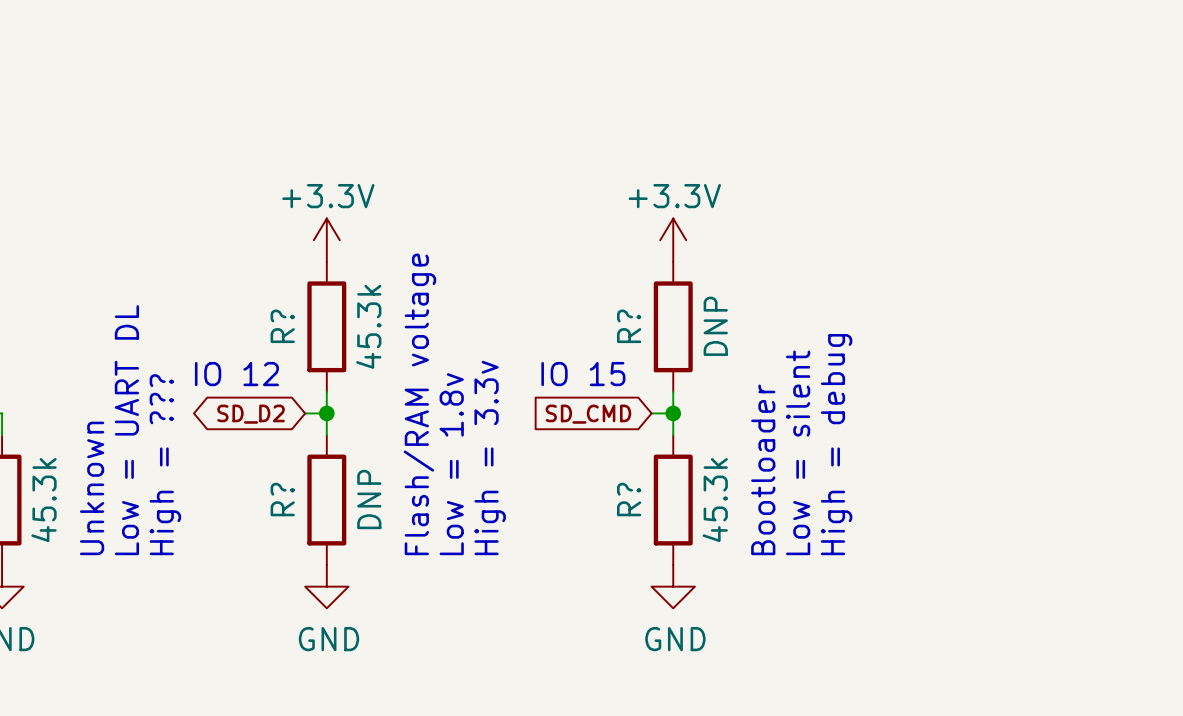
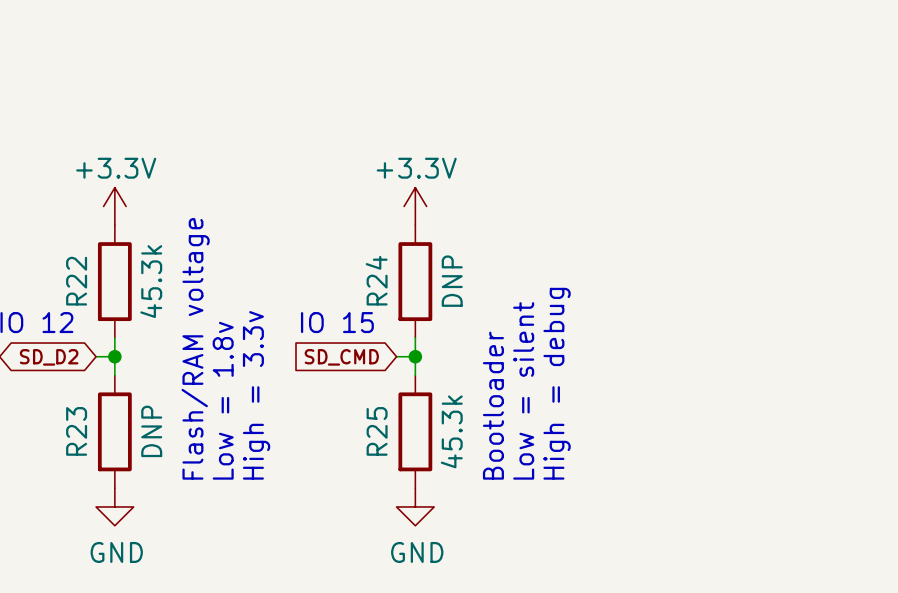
R? name: R? (282, 326) -> R22 (76, 281)
R? name: R? (629, 326) -> R24 (376, 280)
R? name: R? (282, 499) -> R23 (76, 431)
R? name: R? (629, 499) -> R25 (377, 431)

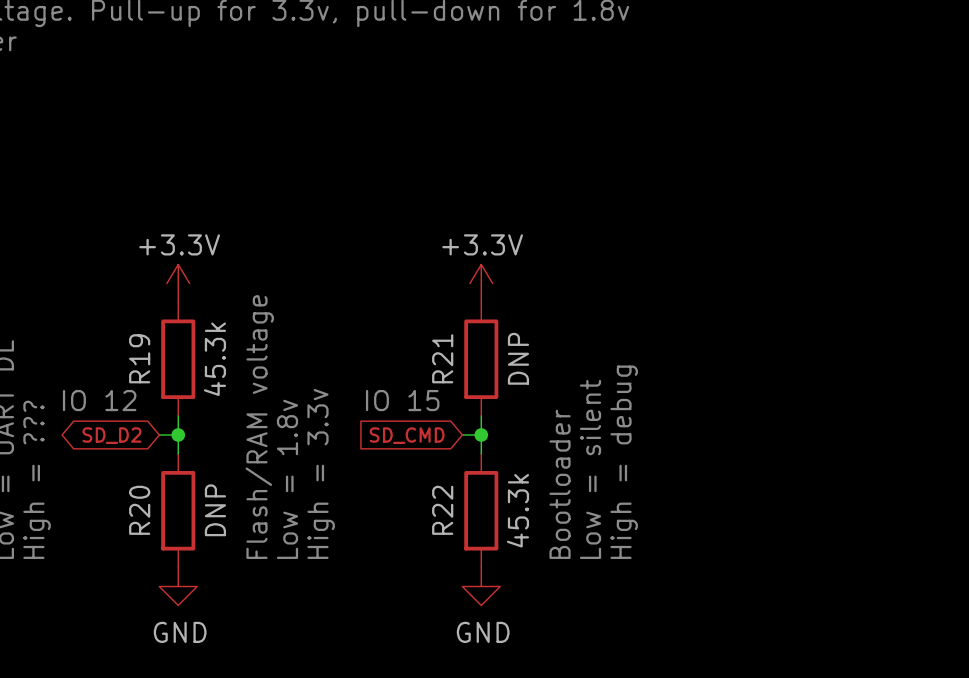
R24 name: R24 (376, 280) -> R21 (442, 358)
R22 name: R22 (76, 281) -> R19 (139, 358)
R23 name: R23 (76, 431) -> R20 (139, 510)
R25 name: R25 (377, 431) -> R22 (442, 510)

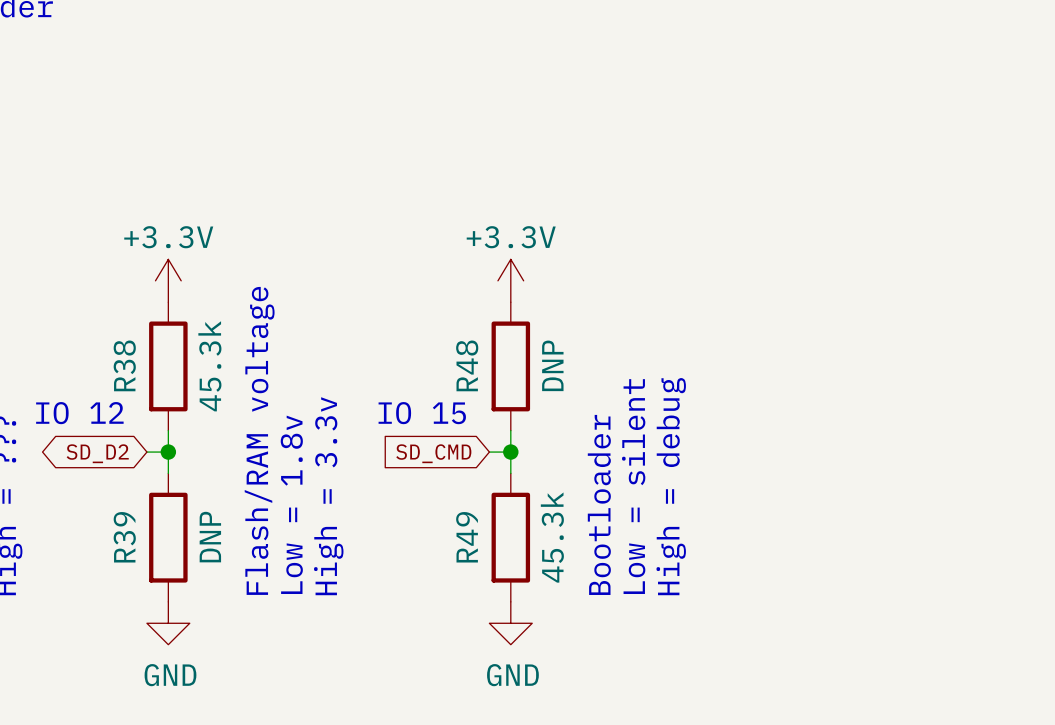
R19 name: R19 (139, 358) -> R38 (124, 365)
R21 name: R21 (442, 358) -> R48 (467, 365)
R20 name: R20 (139, 510) -> R39 (124, 537)
R22 name: R22 (442, 510) -> R49 (467, 537)

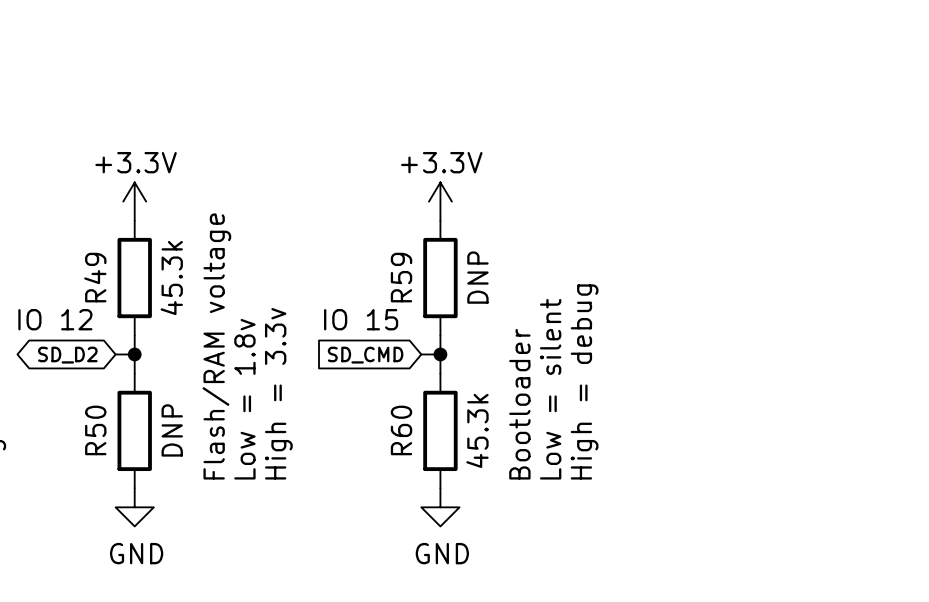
R38 name: R38 (124, 365) -> R49 (95, 277)
R48 name: R48 (467, 365) -> R59 (401, 277)
R39 name: R39 (124, 537) -> R50 (95, 430)
R49 name: R49 (467, 537) -> R60 (401, 430)

